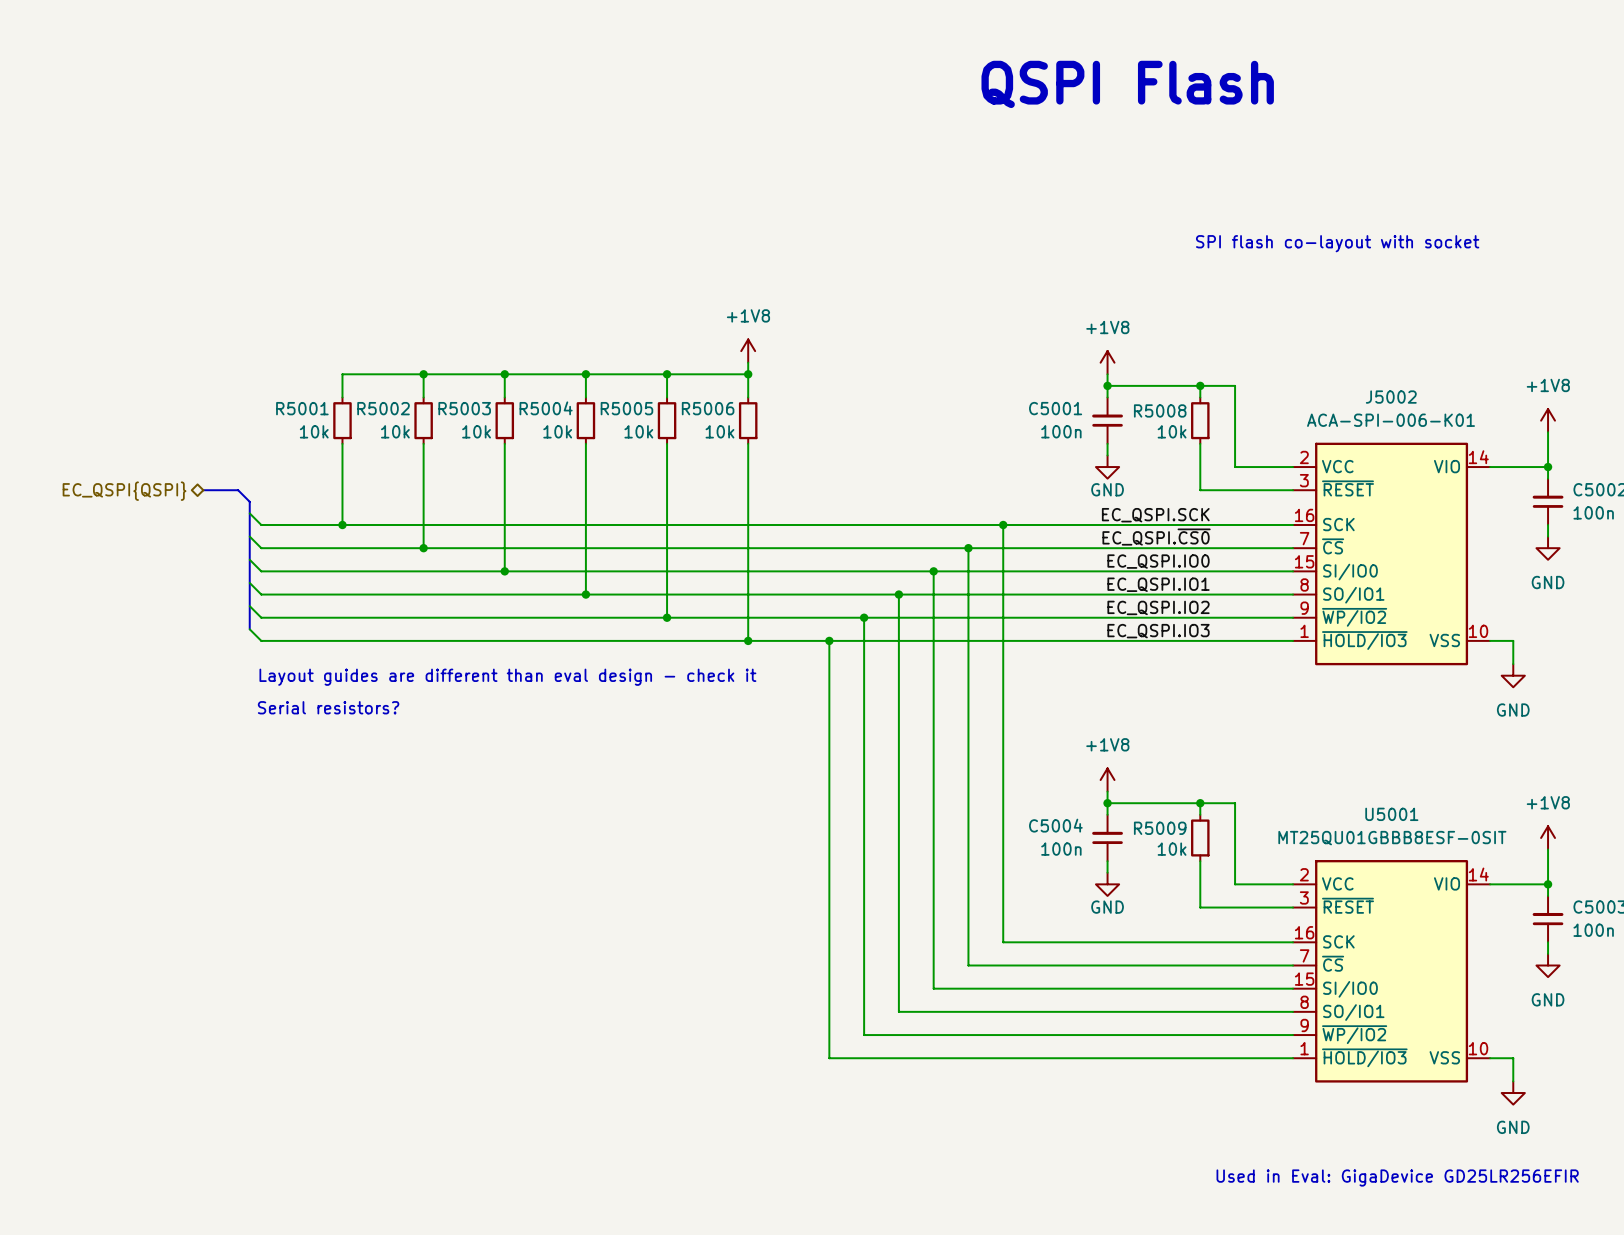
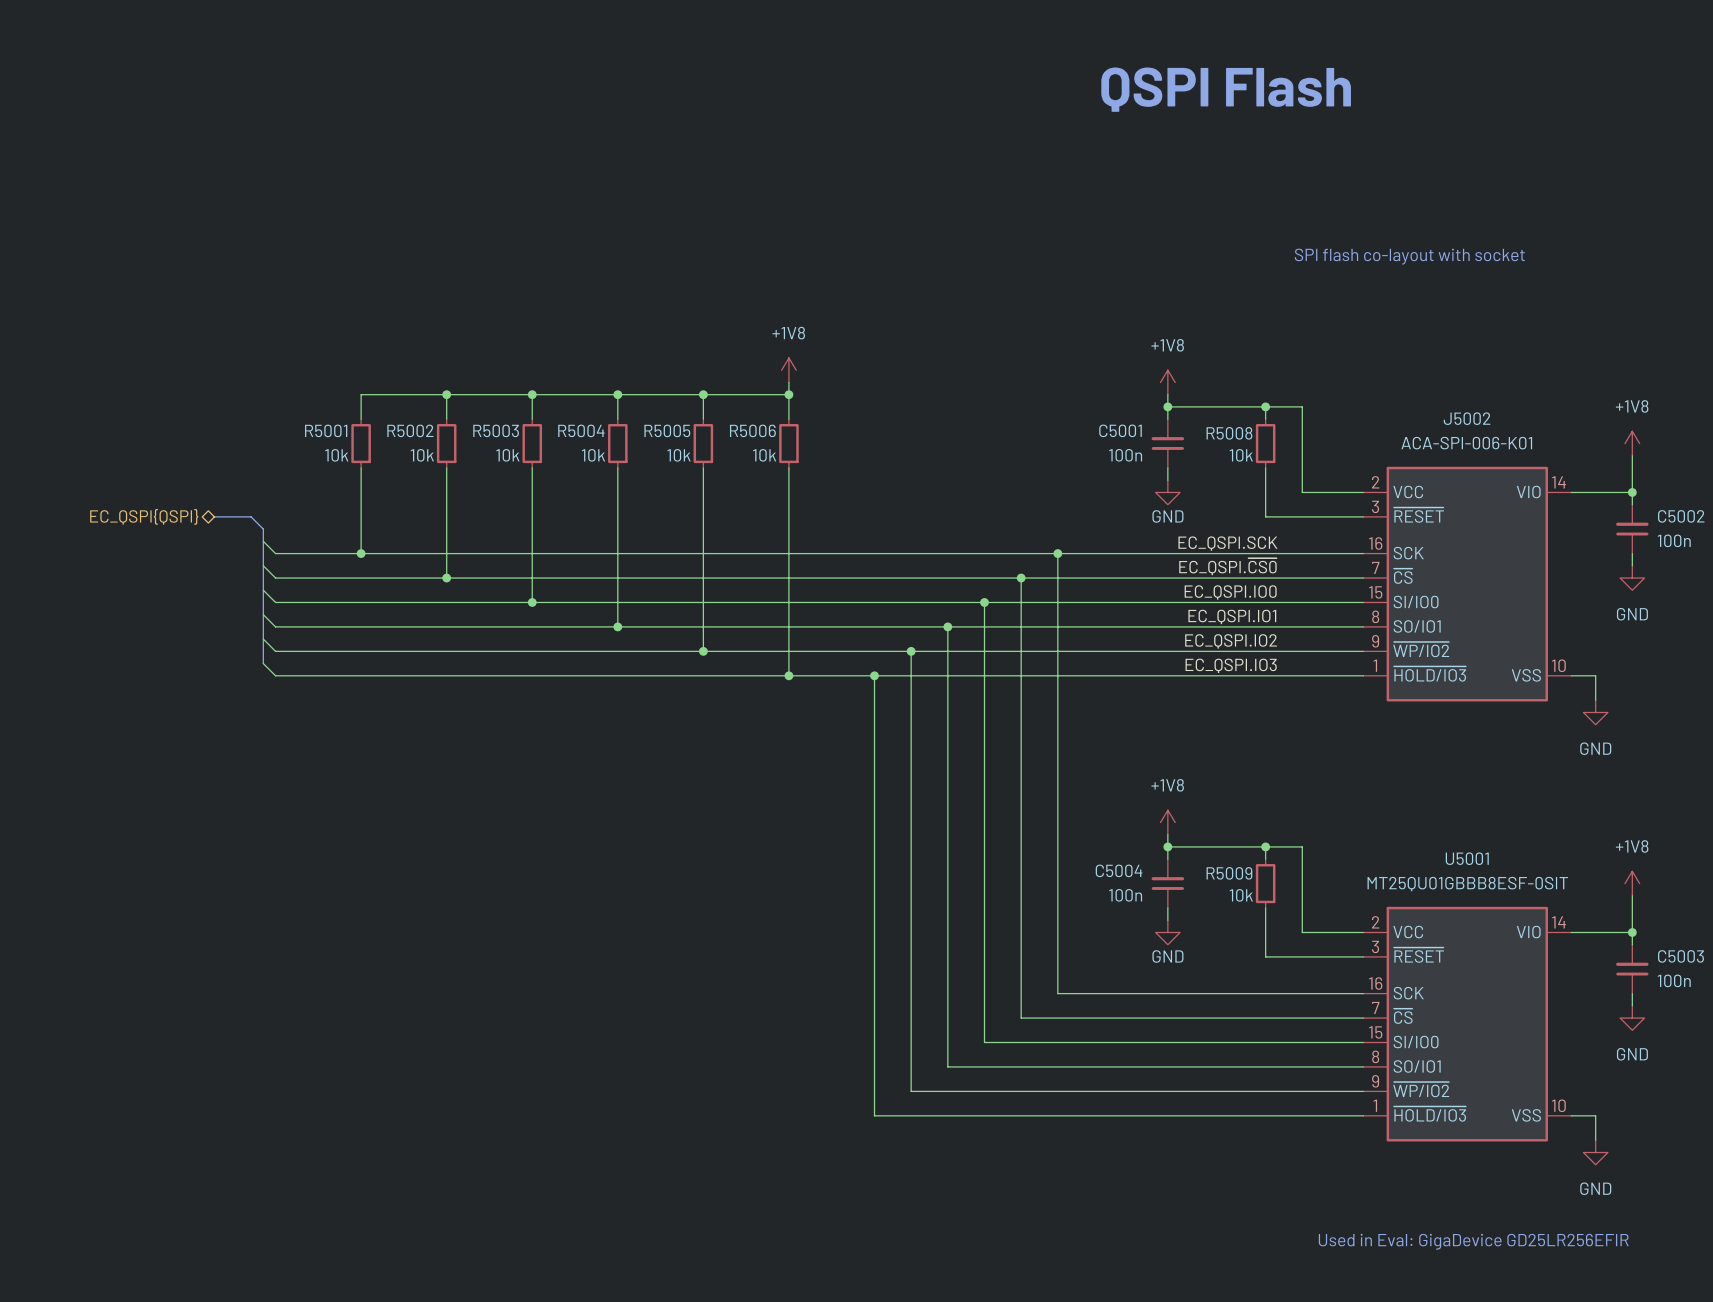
text: Layout guides are different than eval design - check it (507, 677) -> none
text: Serial resistors? (328, 707) -> none

